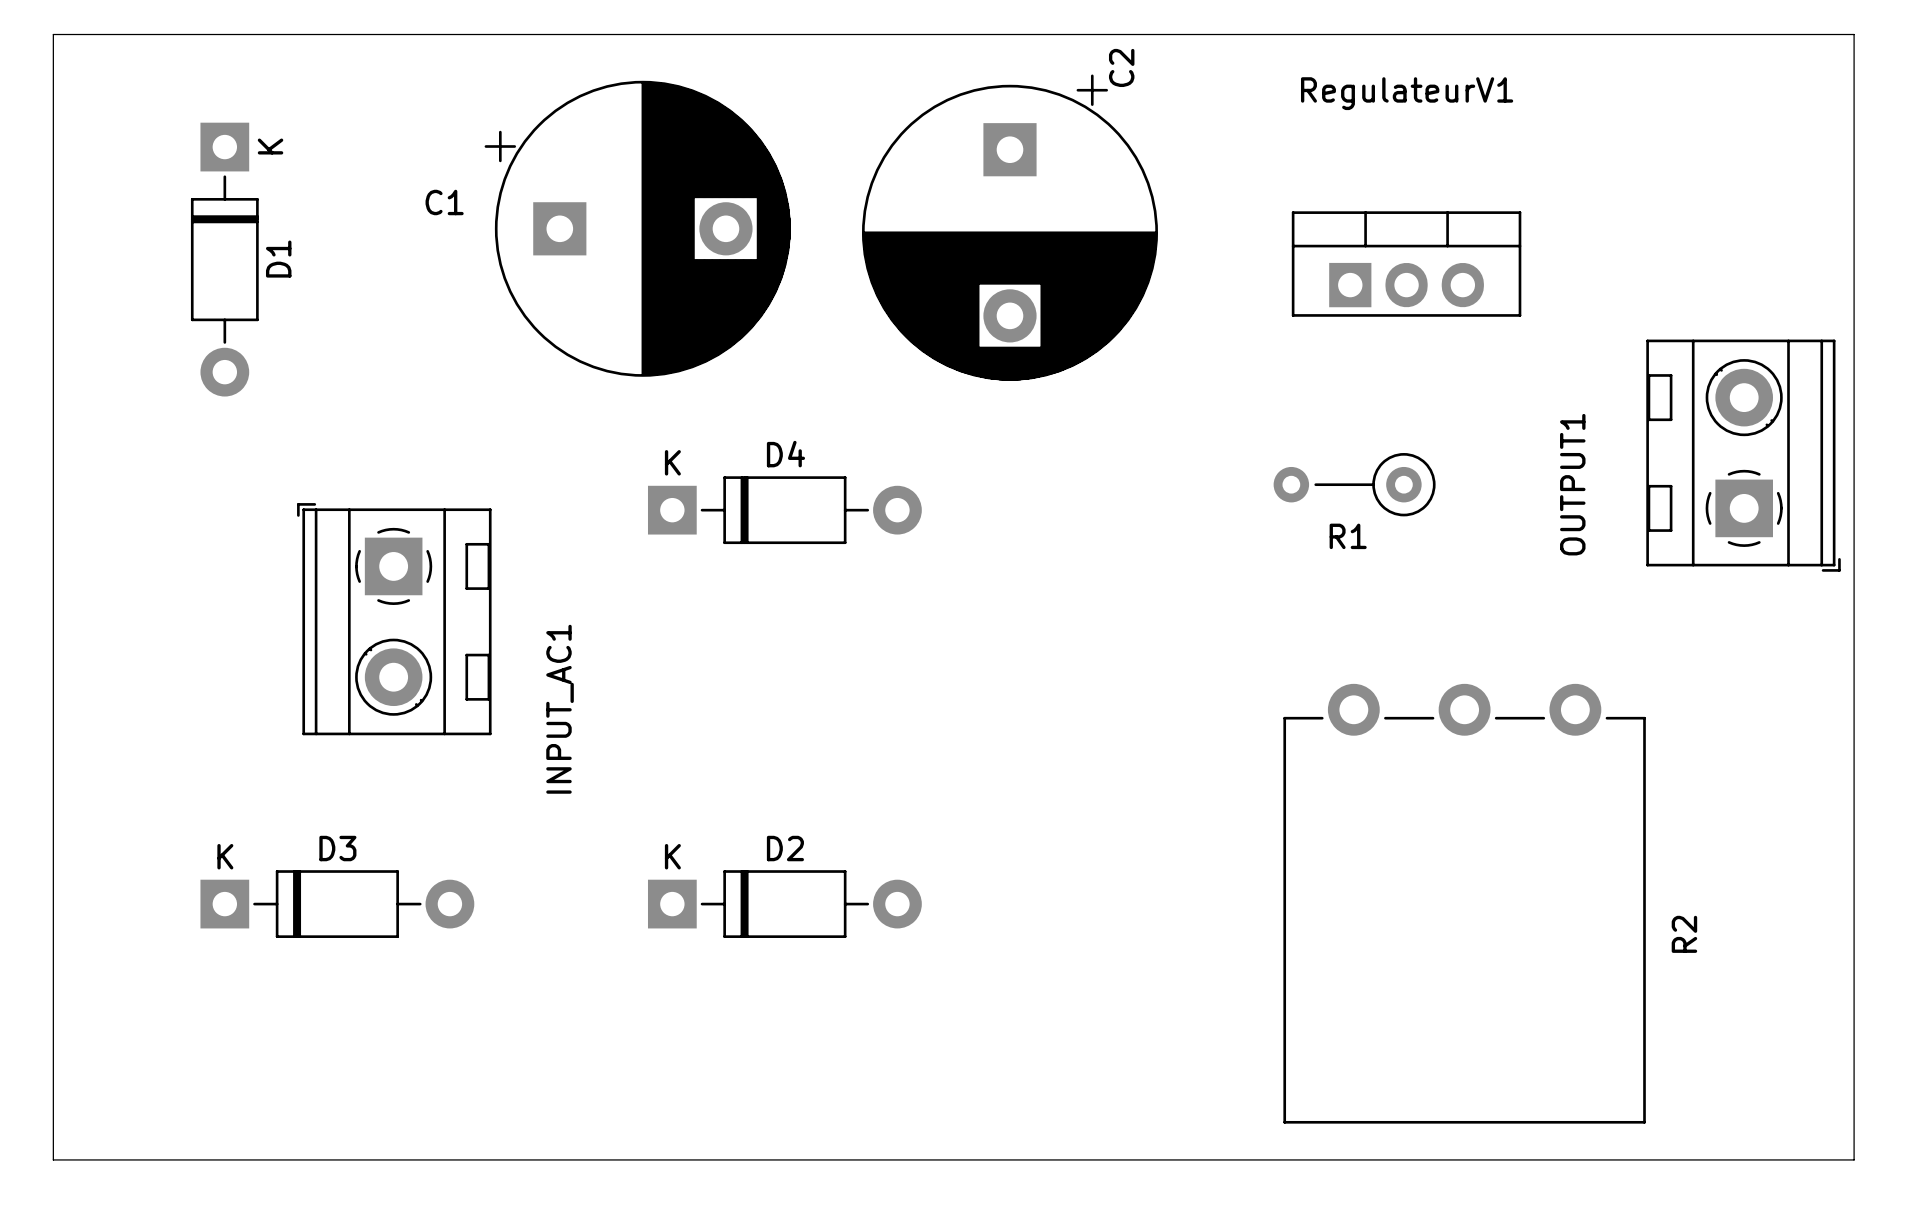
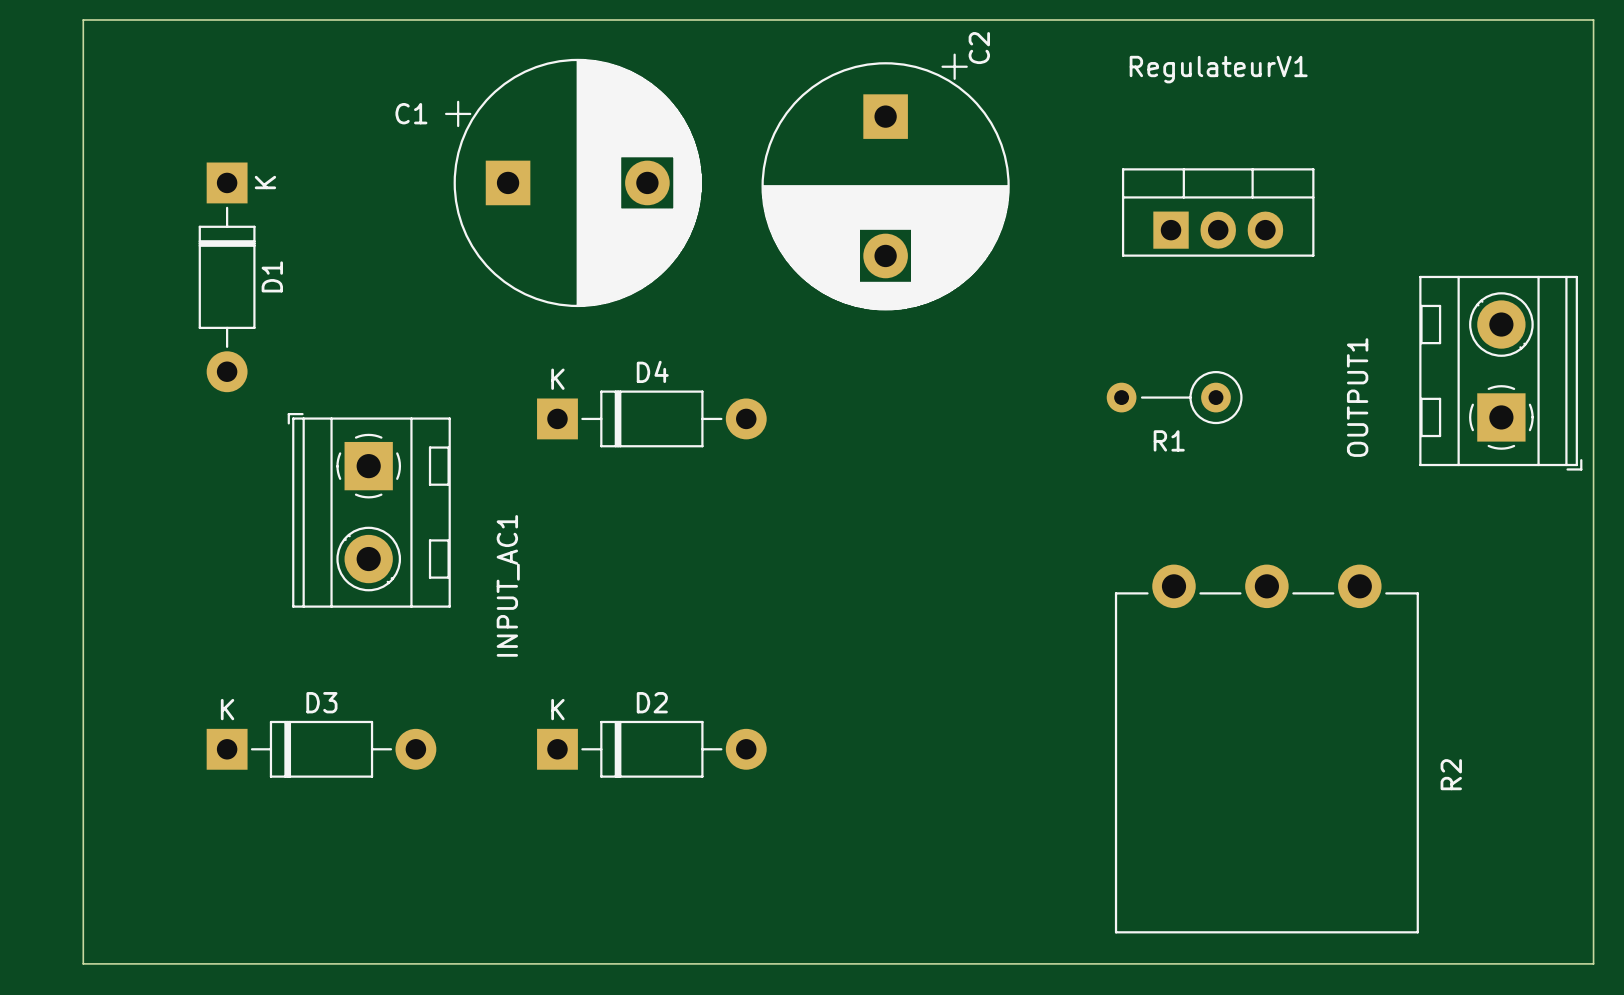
C1 name position: C1 (444, 202) -> C1 (411, 113)
D1 position: (224, 259) -> (227, 277)
D4 position: (784, 510) -> (651, 418)
D2 position: (784, 904) -> (651, 749)

